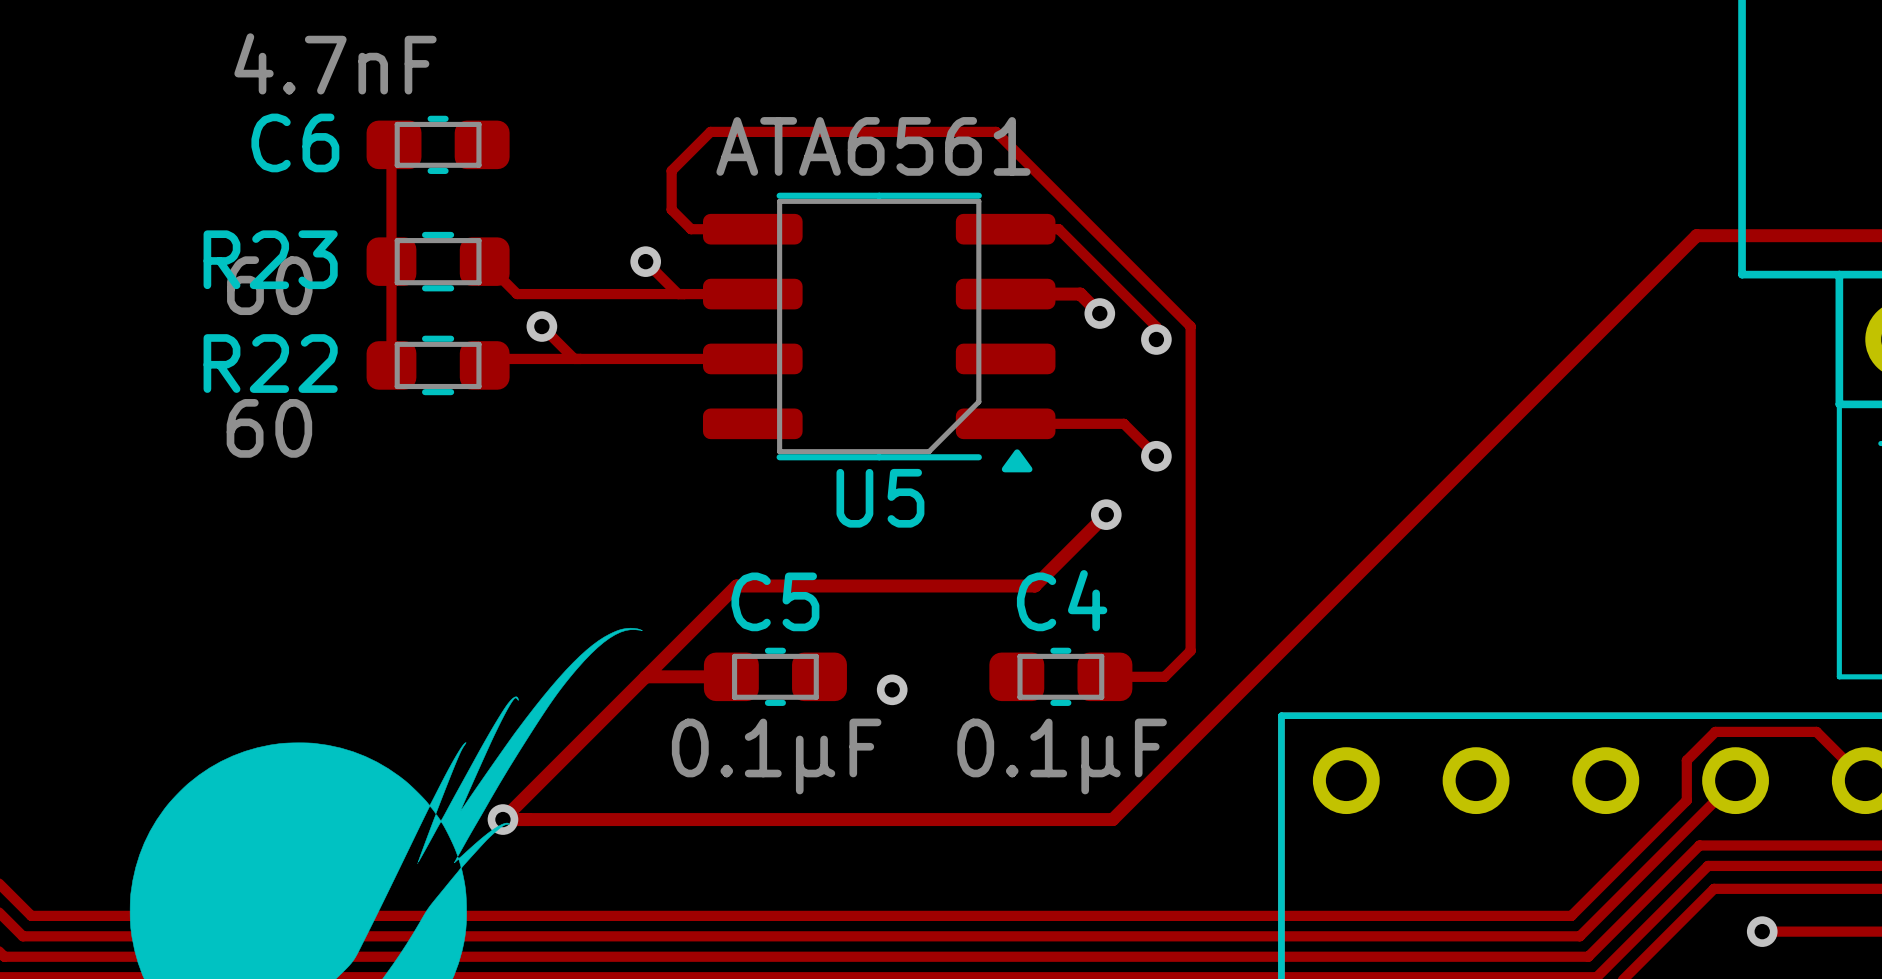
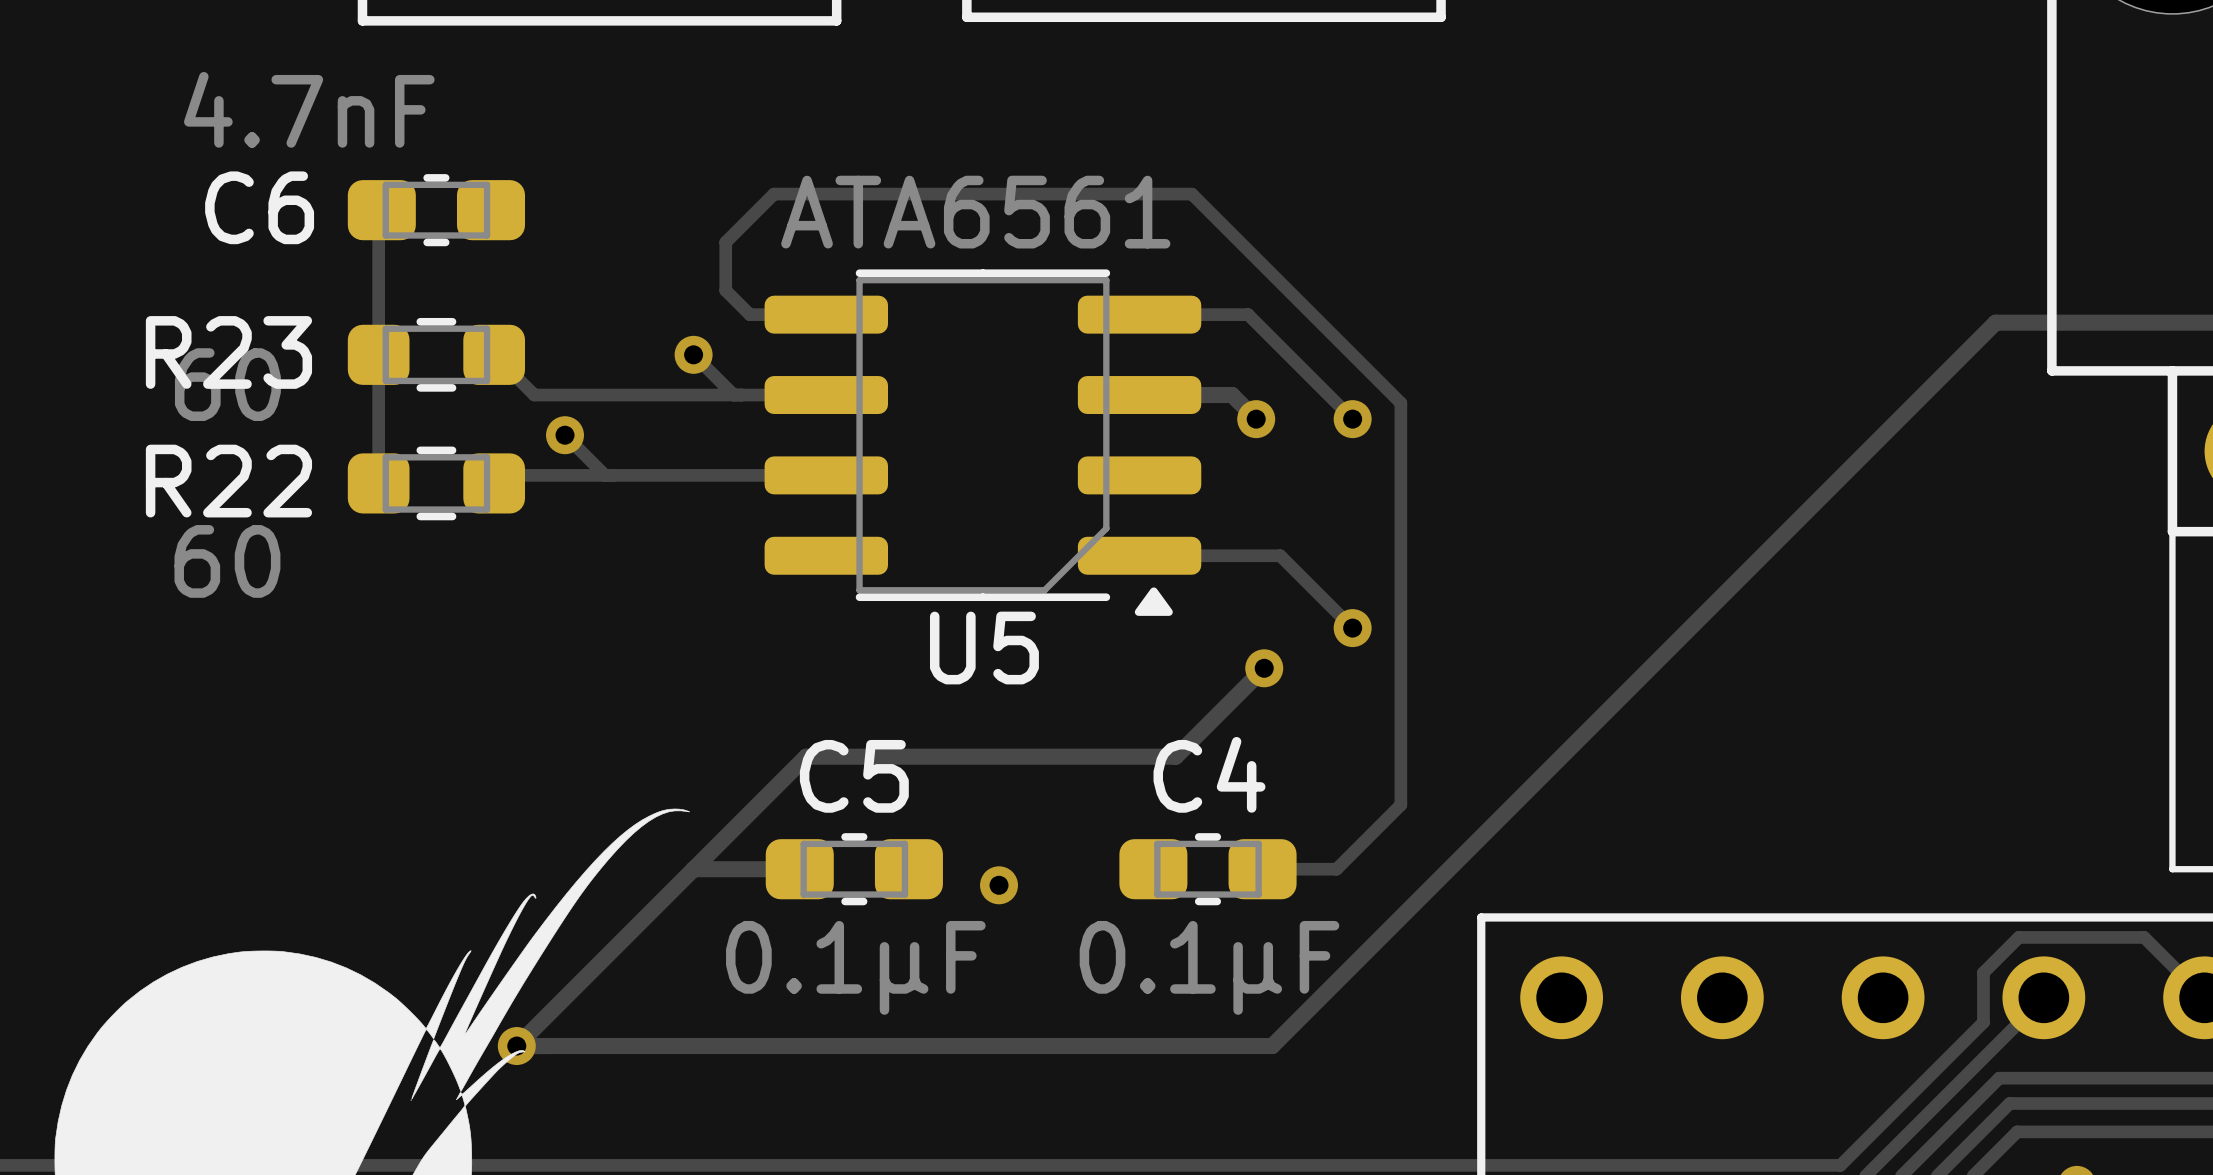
track: (996, 131) (1093, 229) -> (1205, 314) (1248, 314)
track: (1058, 229) (1156, 326) (1156, 339) -> none
track: (1177, 313) (1190, 326) (1190, 650) -> (1127, 194) (1191, 194) (1400, 403) (1400, 804) (1368, 837)
via position: (1156, 339) -> (1352, 419)
track: (1119, 423) (1123, 423) (1156, 456) -> (1280, 555) (1352, 628)
via position: (1156, 456) -> (1352, 628)

